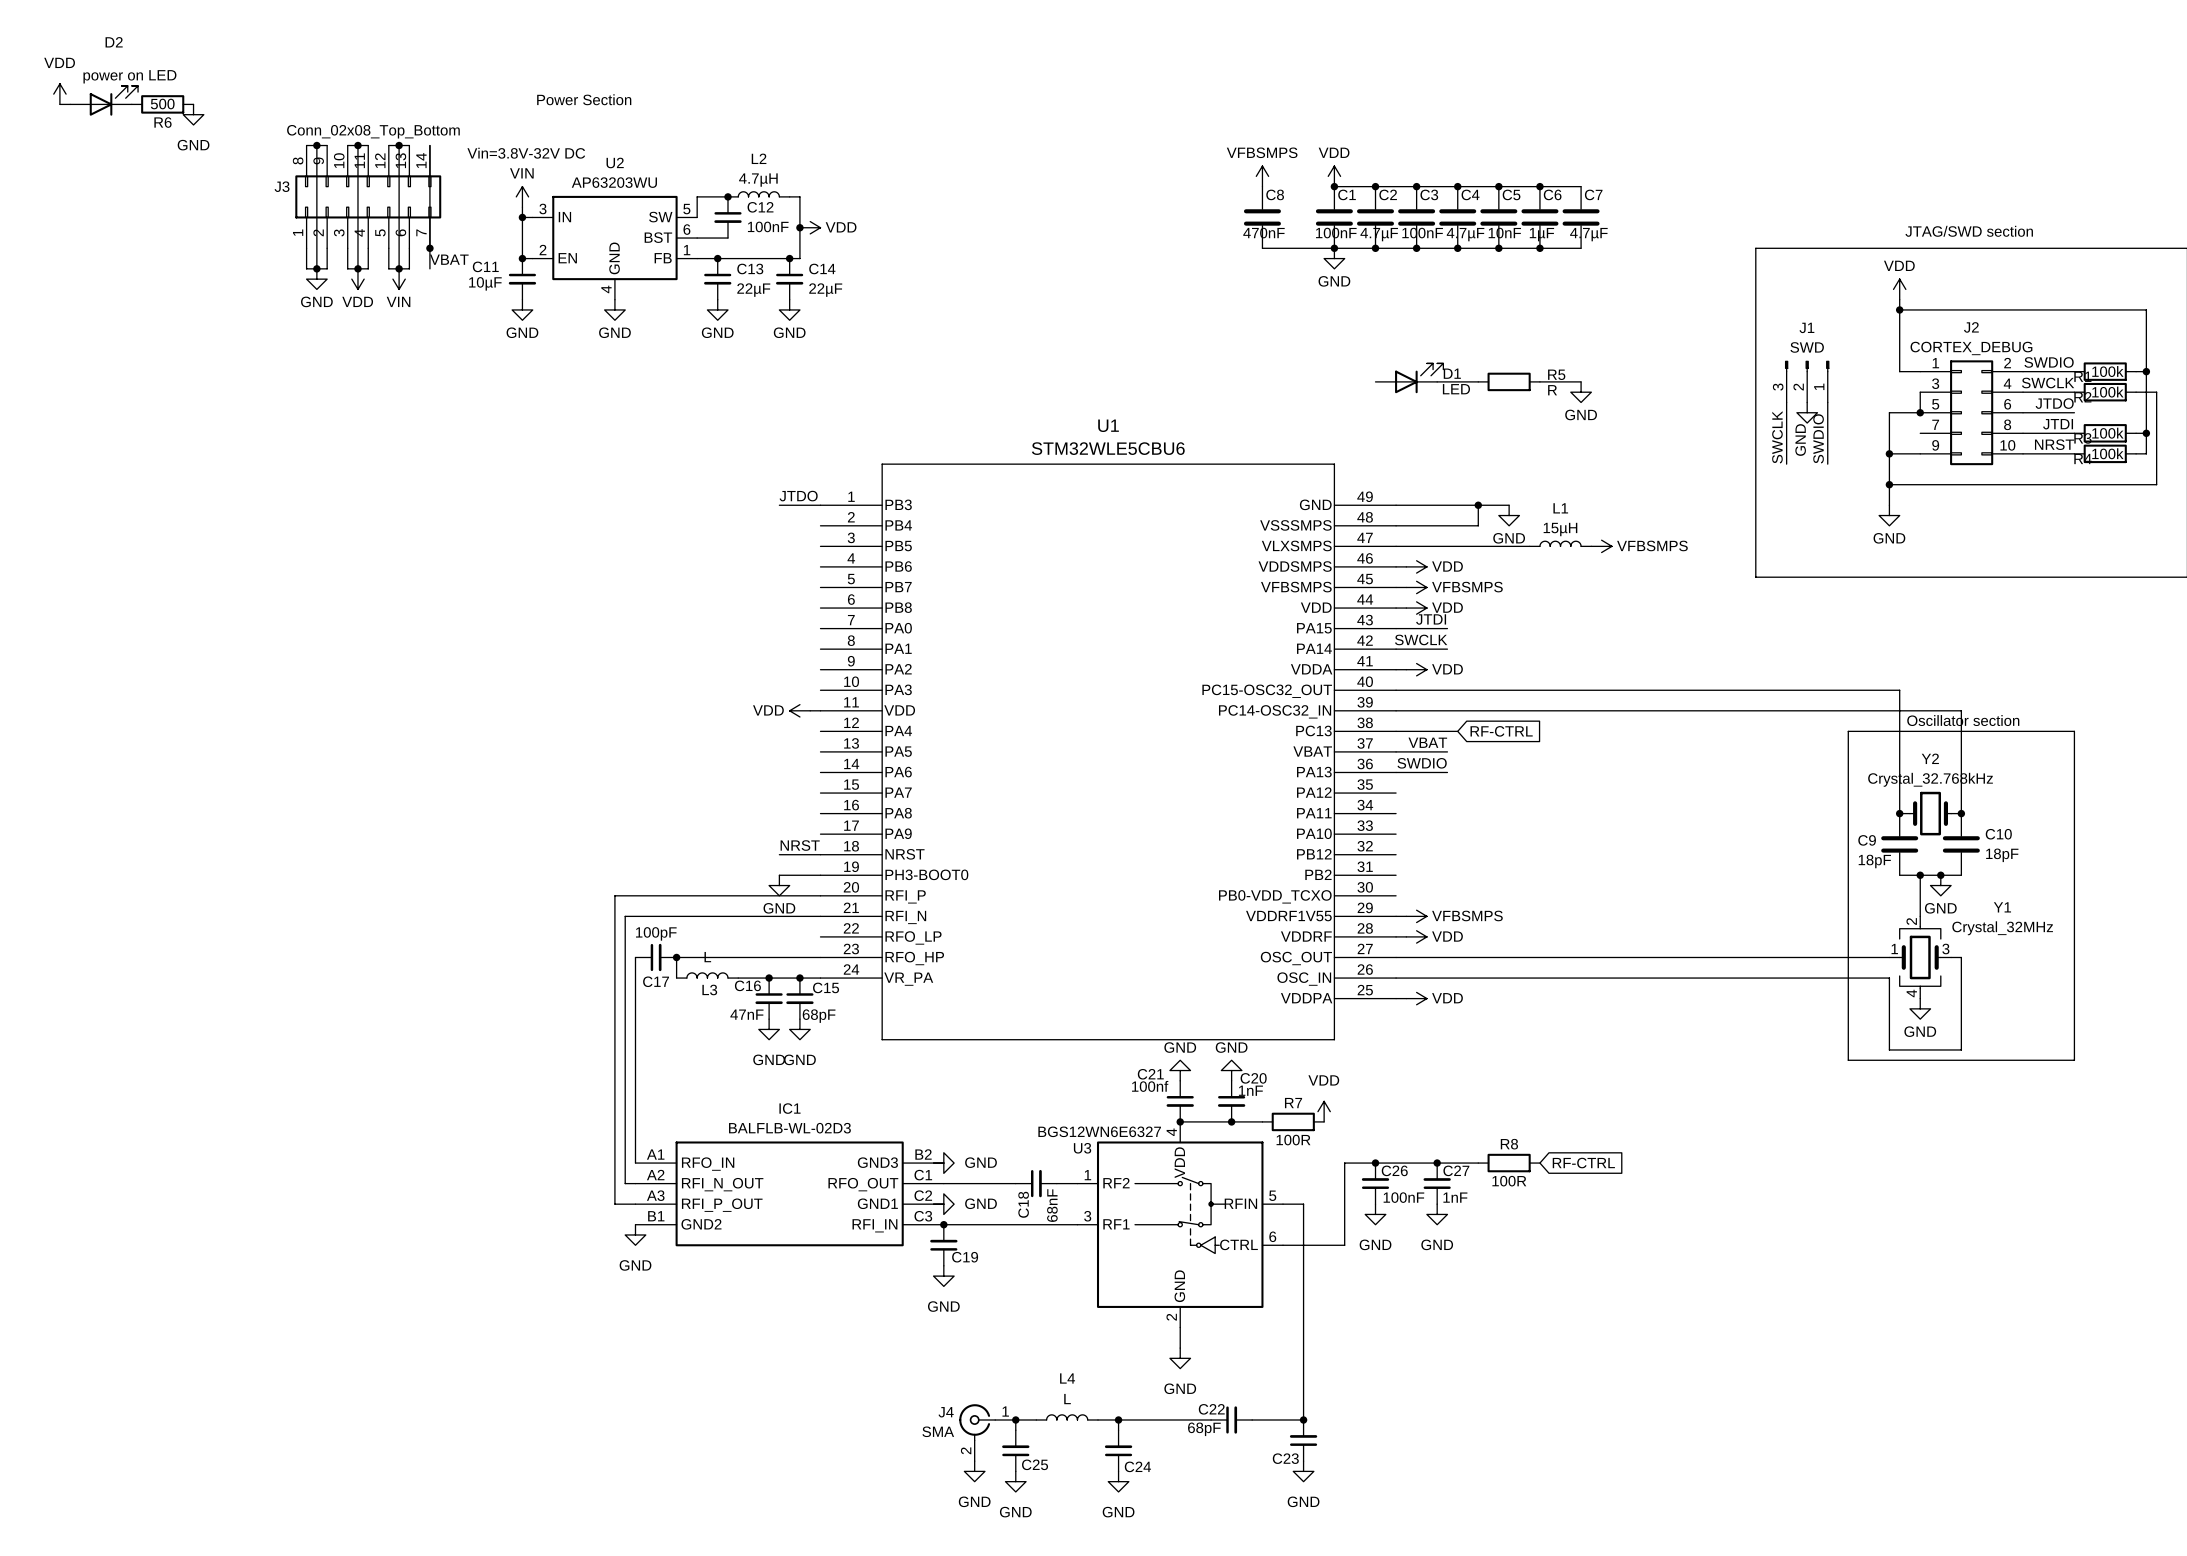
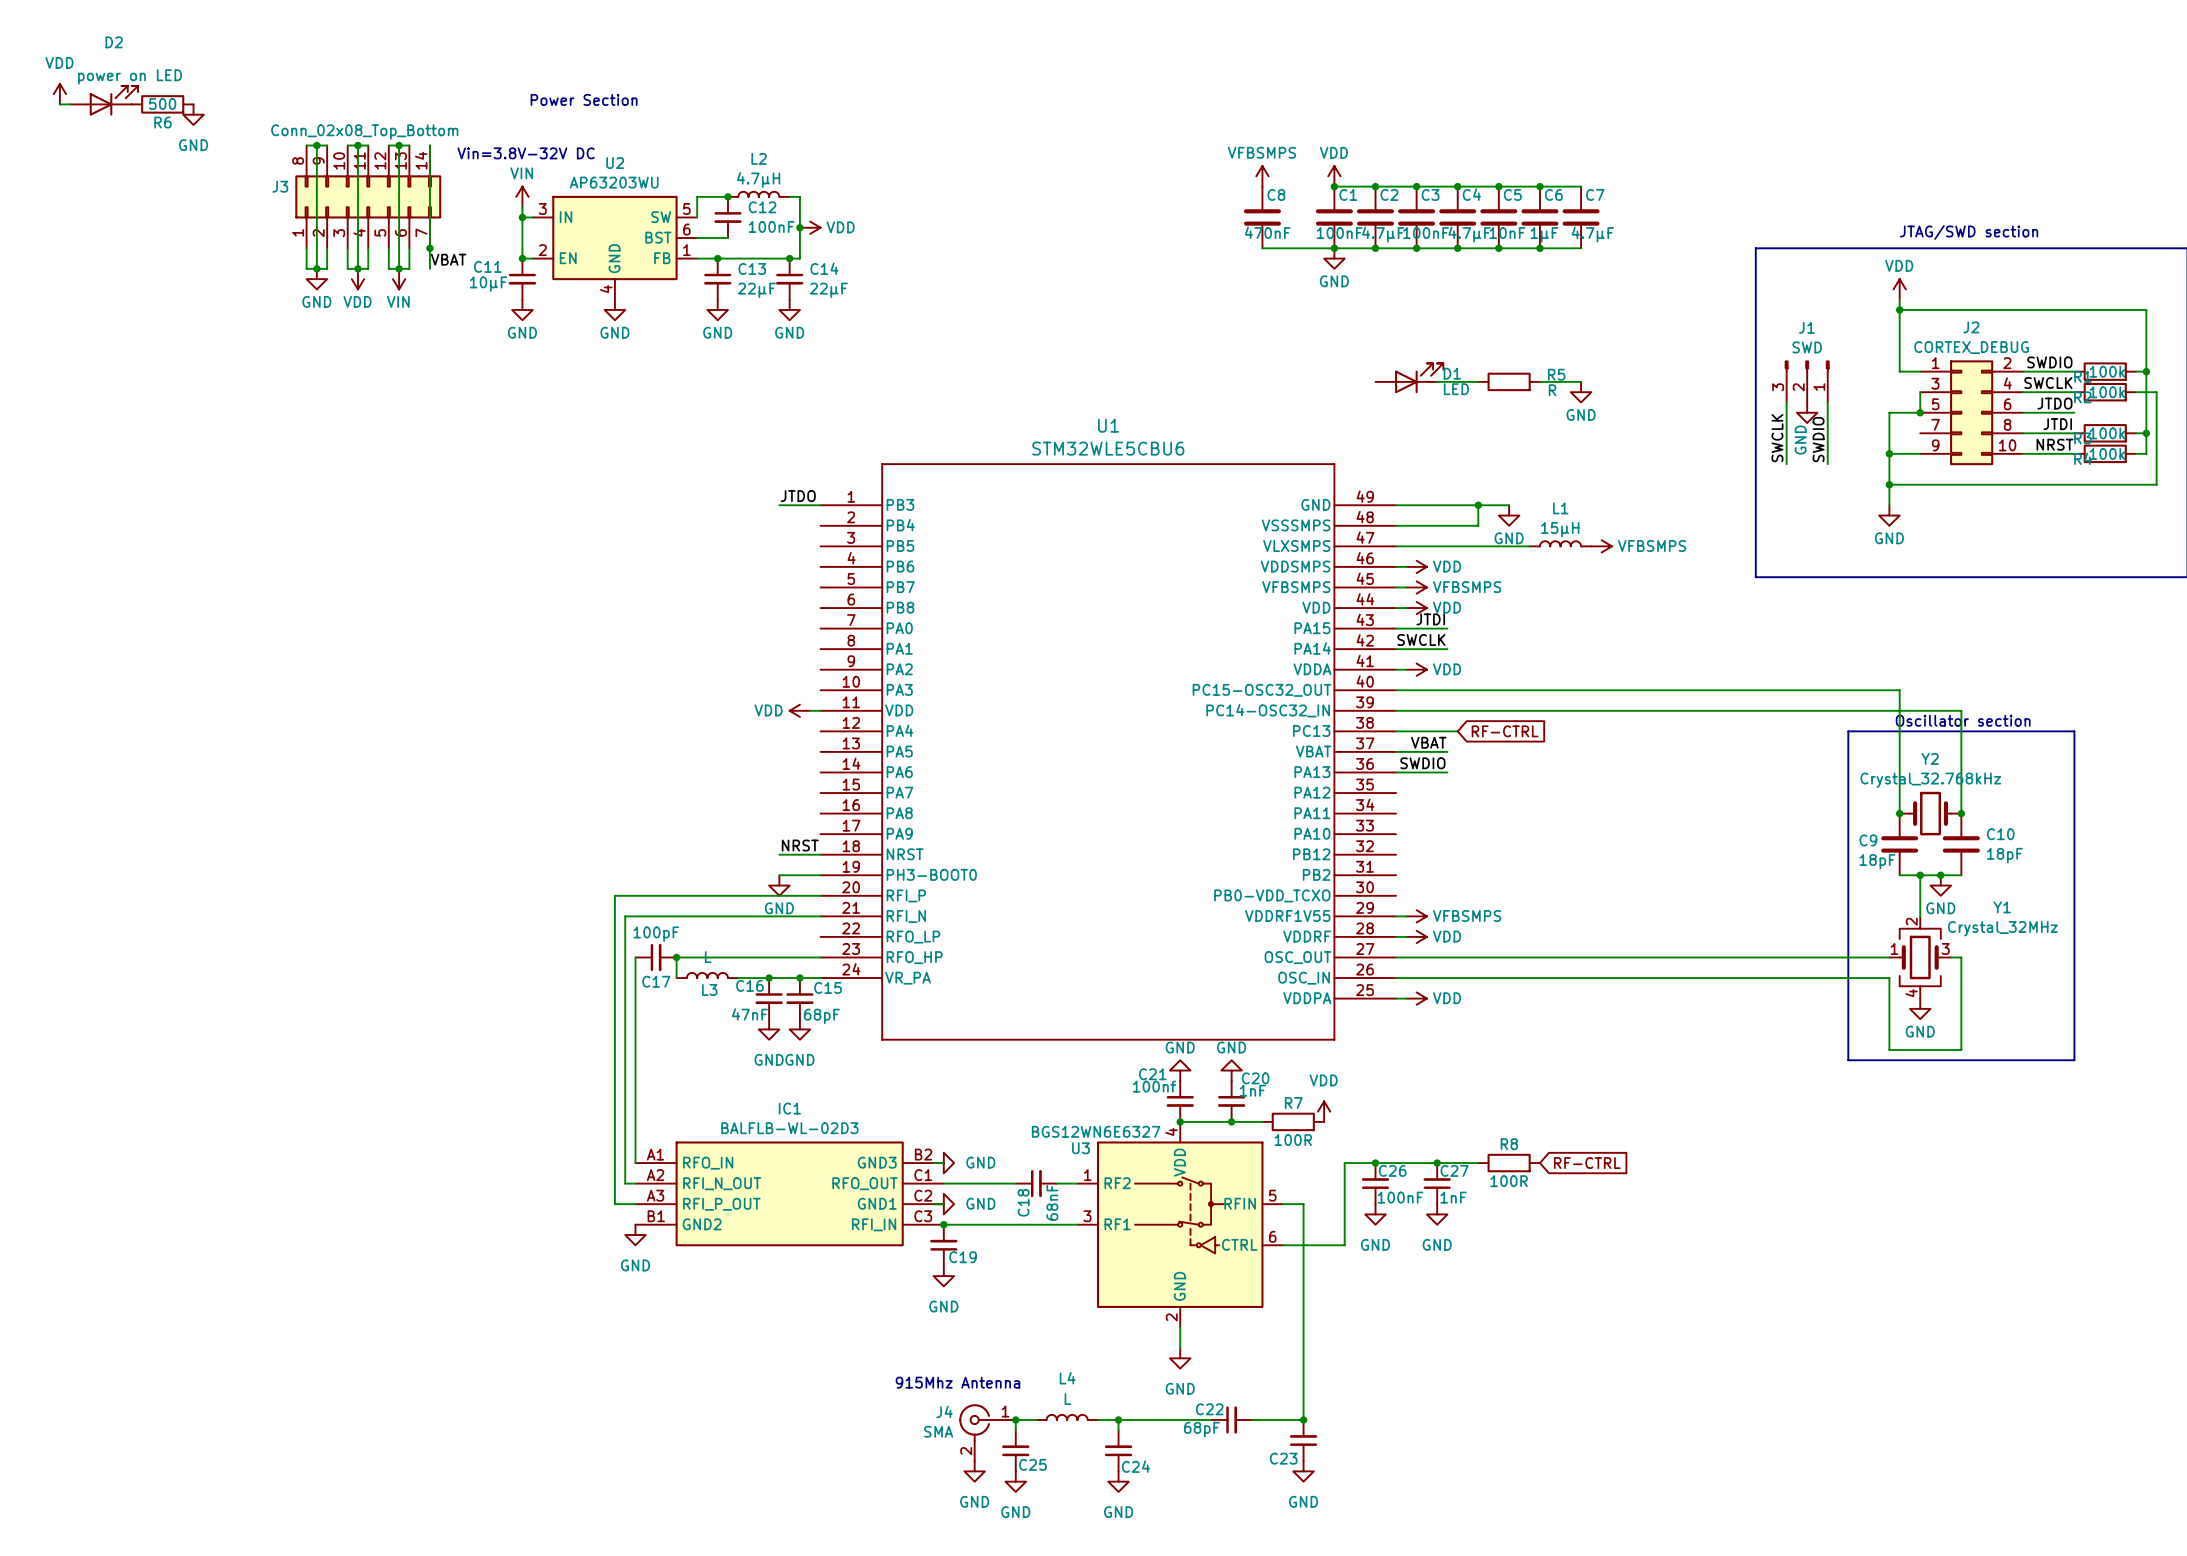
text: none -> 915Mhz Antenna (957, 1382)

